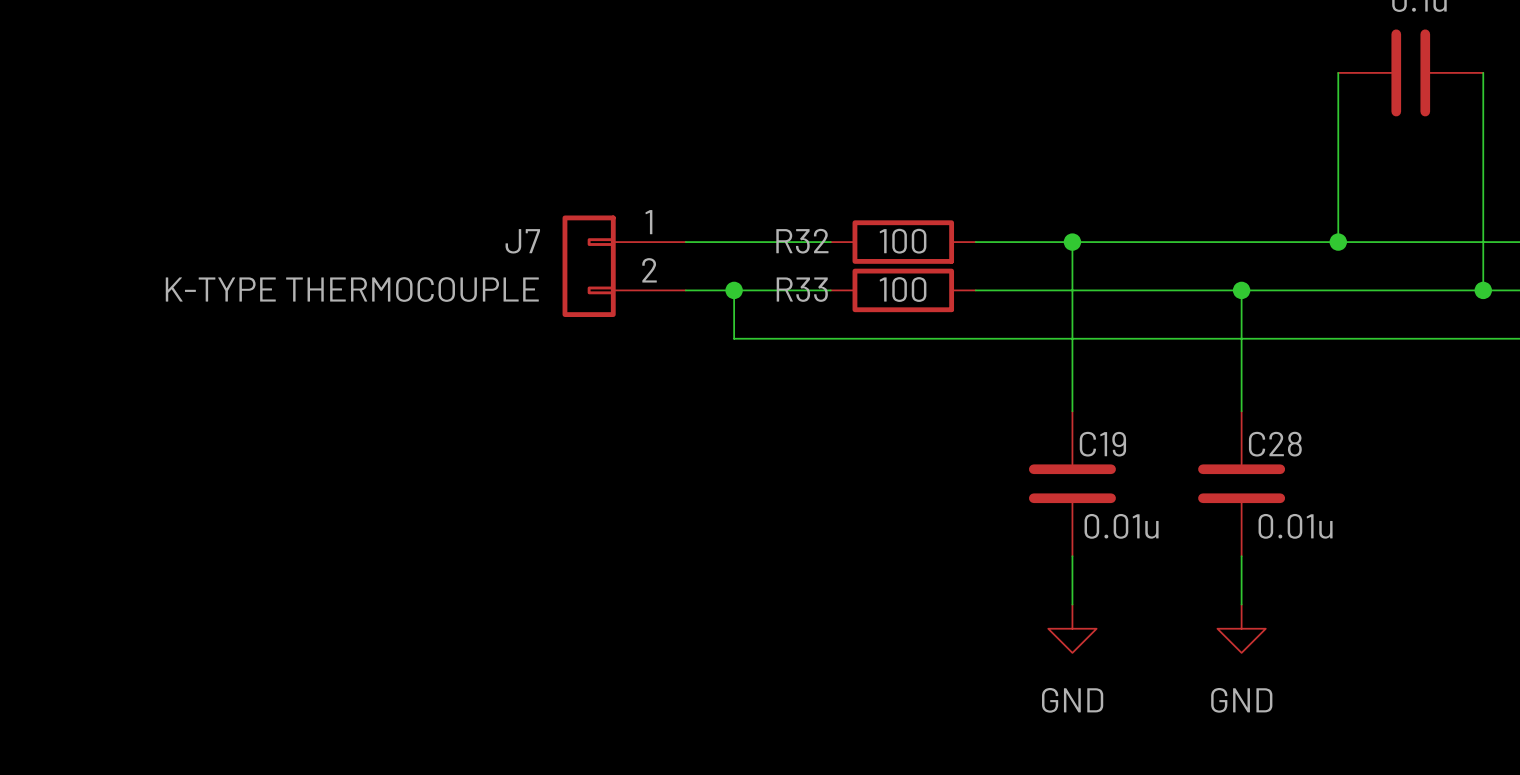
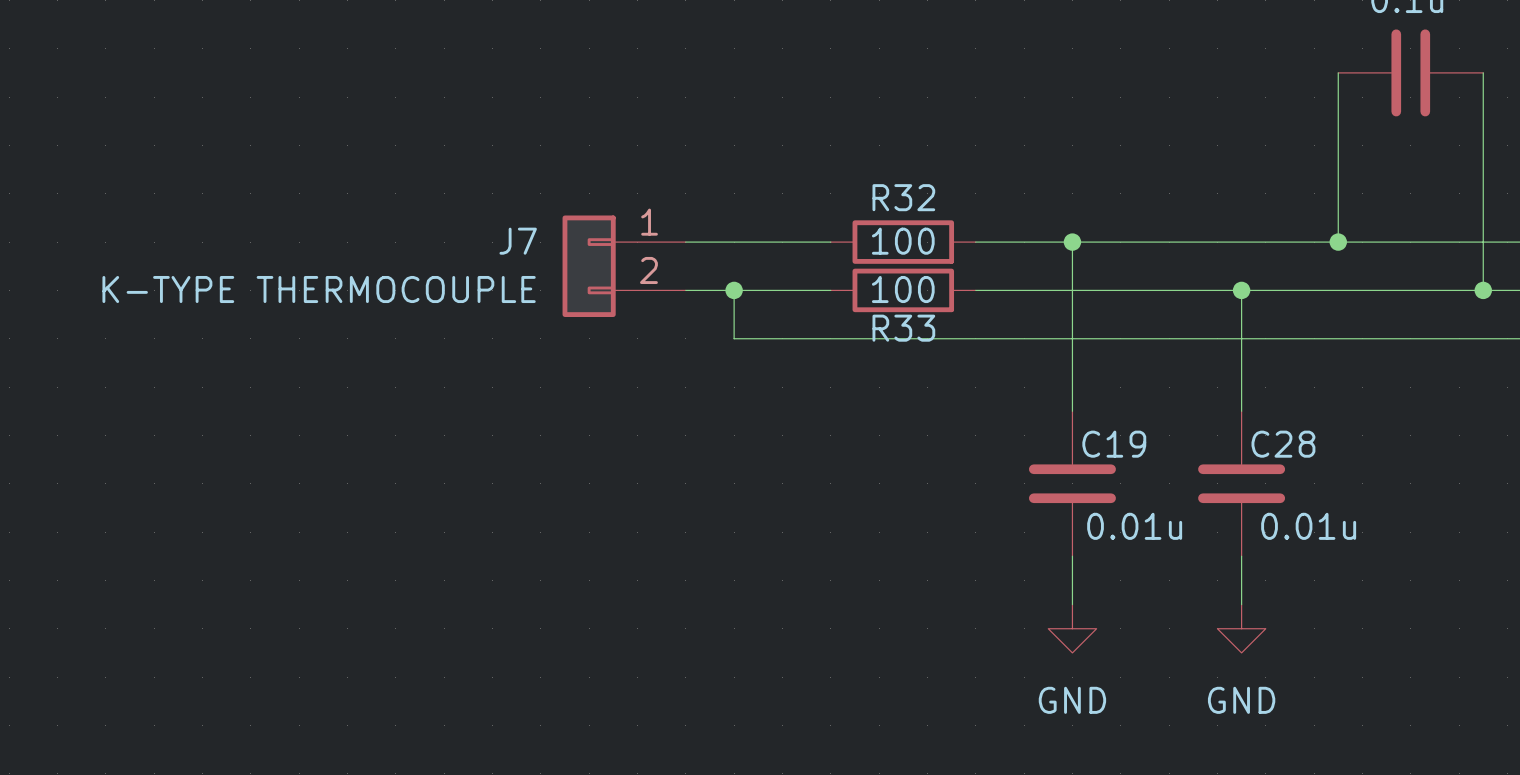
R32 name position: R32 (802, 241) -> R32 (903, 197)
R33 name position: R33 (802, 289) -> R33 (903, 328)

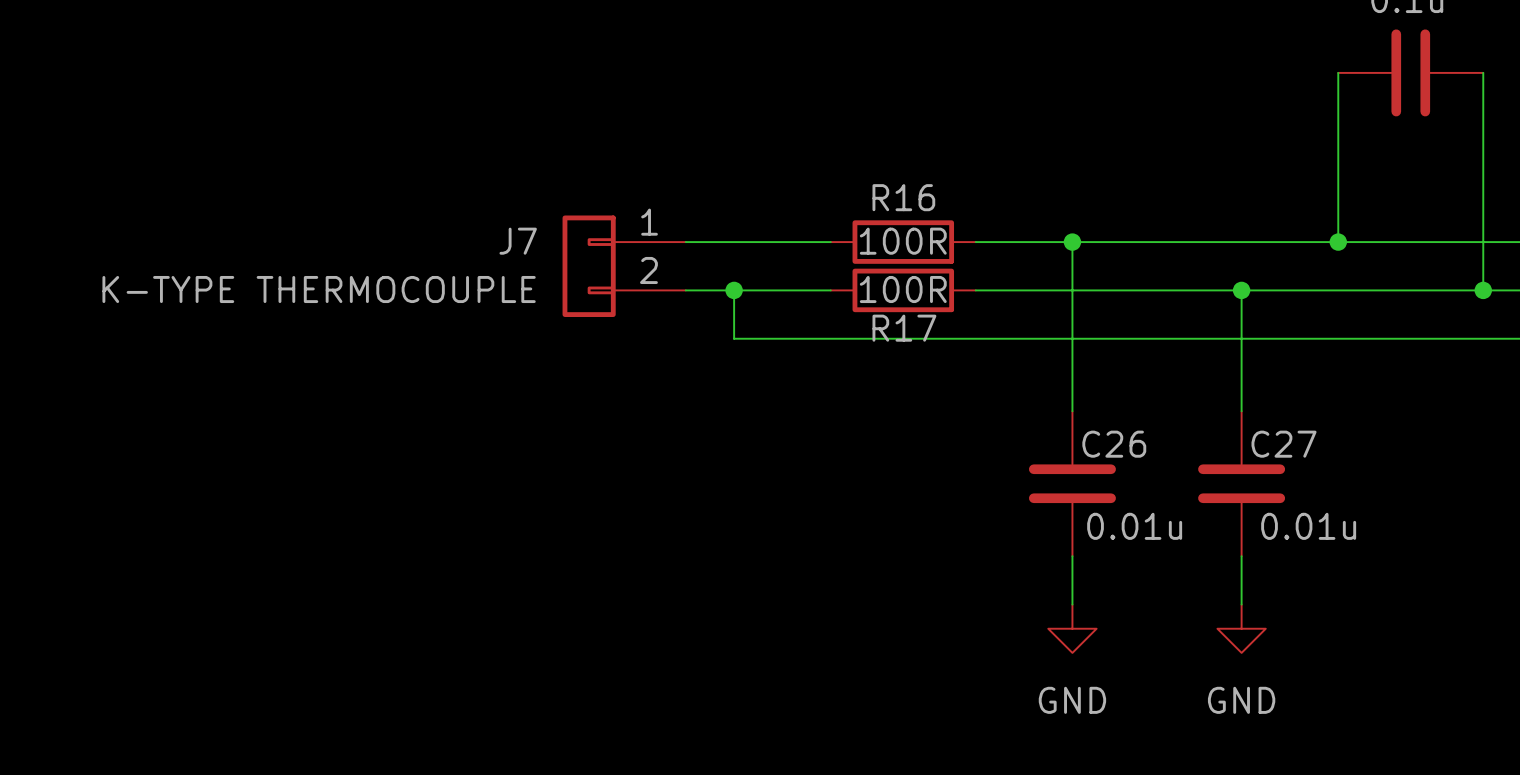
R32 name: R32 (903, 197) -> R16 (903, 197)
R32 value: 100 (903, 241) -> 100R (903, 241)
R33 value: 100 (903, 289) -> 100R (903, 289)
R33 name: R33 (903, 328) -> R17 (904, 328)
C19 name: C19 (1114, 444) -> C26 (1114, 444)
C28 name: C28 (1283, 444) -> C27 (1284, 444)

